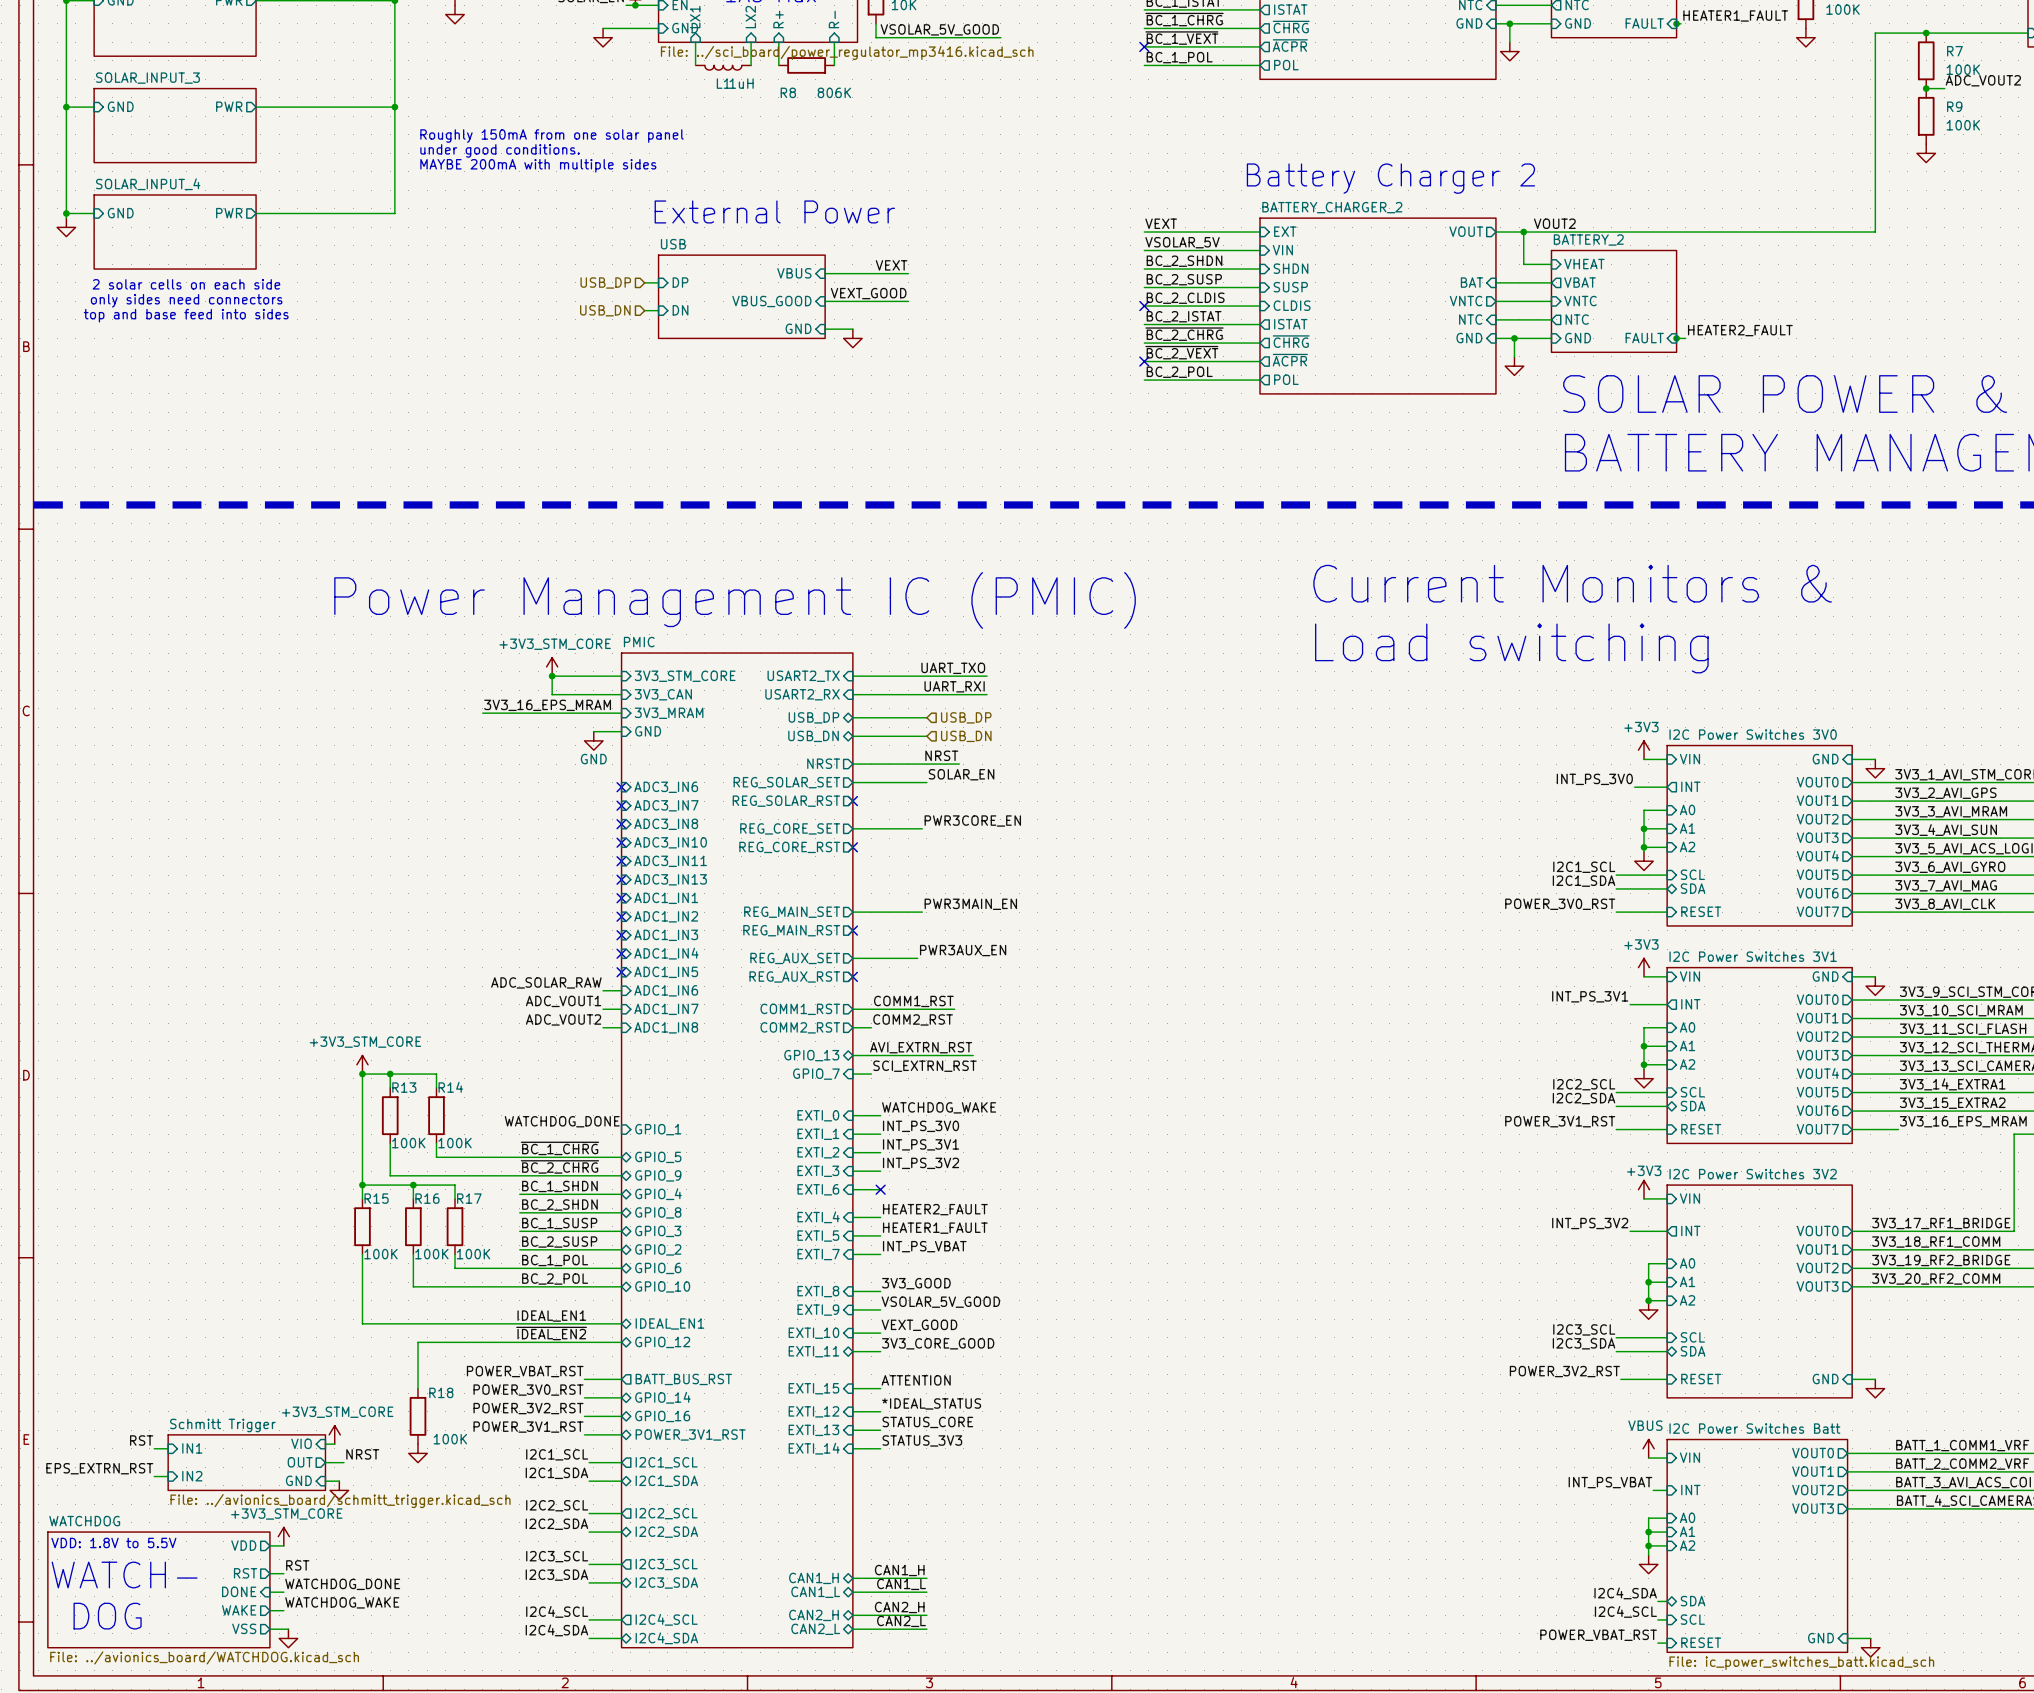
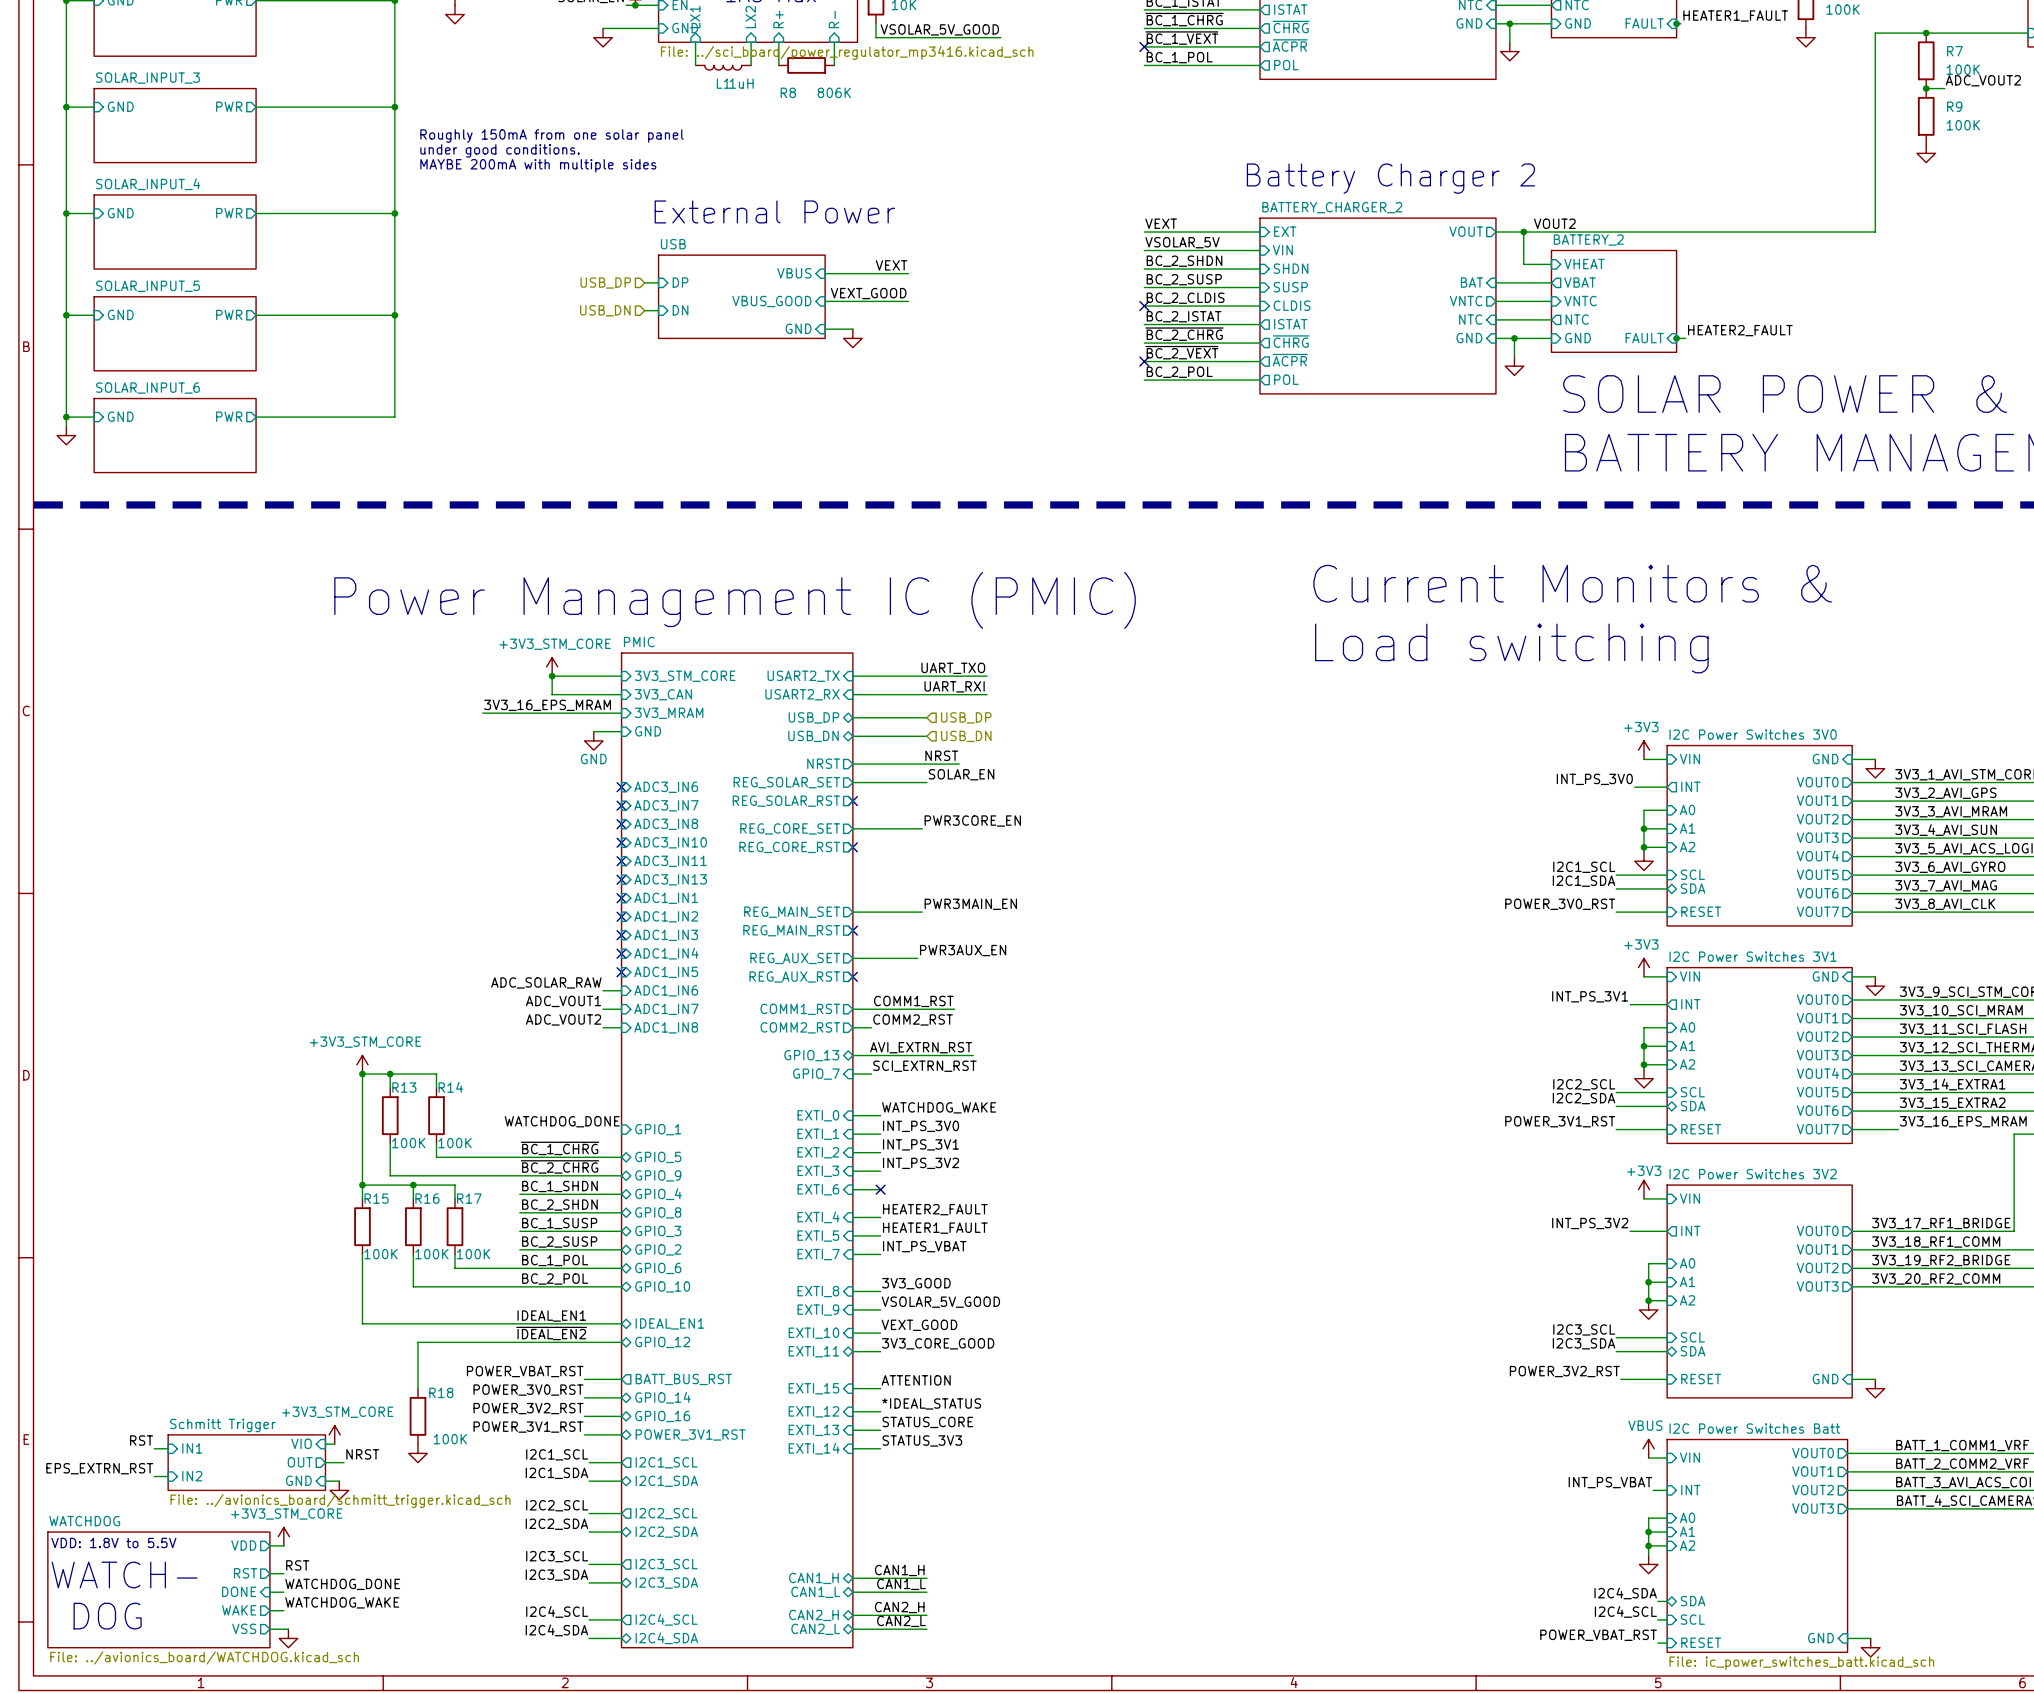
wire: none -> (394, 213) (394, 417) (256, 417)
junction: none -> (394, 213)
wire: none -> (66, 218) (66, 426)
power symbol: (66, 227) -> none
text: 2 solar cells on each side (186, 284) -> none
text: only sides need connectors (186, 300) -> none
sheet pin: none -> GND (120, 314)
sheet pin: none -> PWR (229, 314)
wire: none -> (66, 315) (94, 315)
junction: none -> (66, 315)
text: top and base feed into sides (186, 315) -> none
wire: none -> (256, 315) (394, 315)
junction: none -> (394, 315)
sheet SOLAR_INPUT_5: none -> (175, 333)
sheet pin: none -> GND (120, 416)
sheet pin: none -> PWR (229, 416)
wire: none -> (66, 417) (94, 417)
junction: none -> (66, 417)
power symbol: none -> (66, 435)
sheet SOLAR_INPUT_6: none -> (175, 435)

